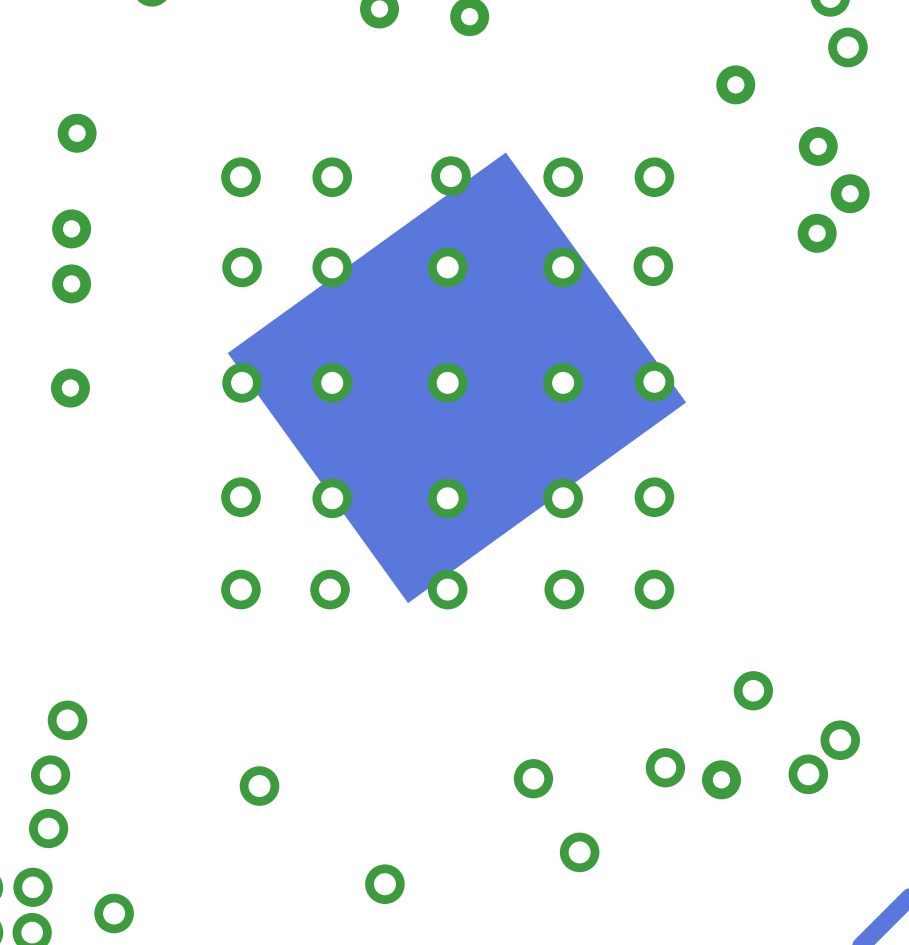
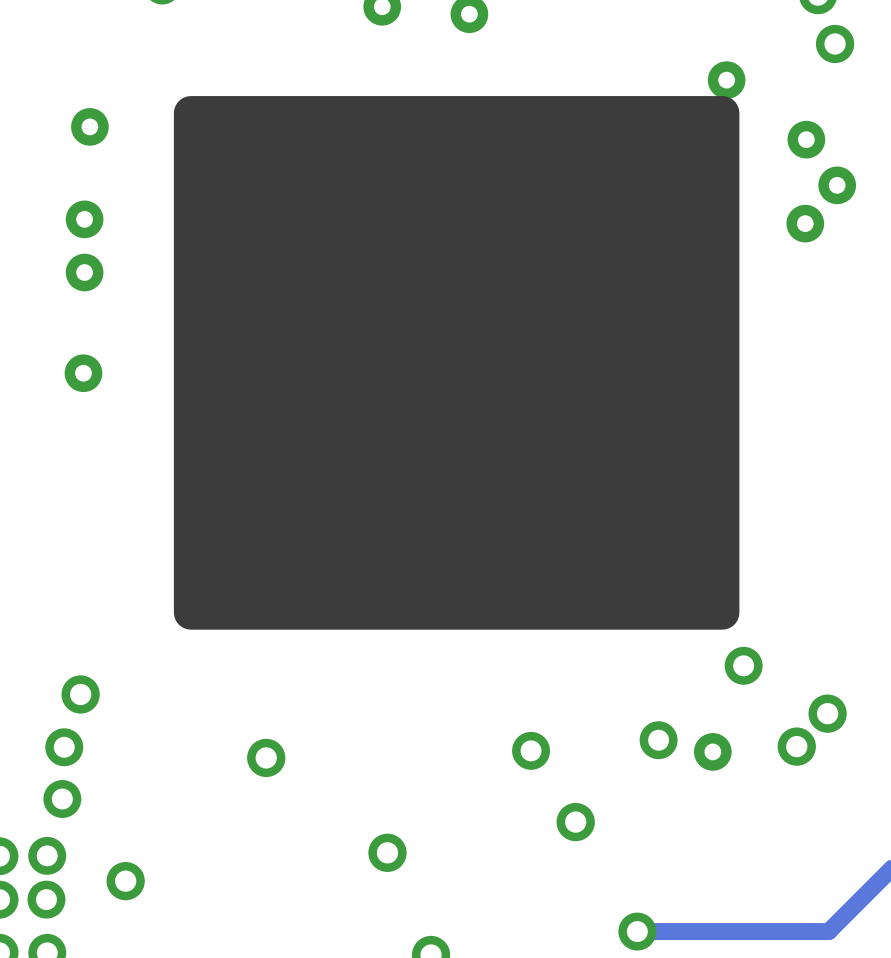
drawing: none -> [173, 96, 740, 630]

